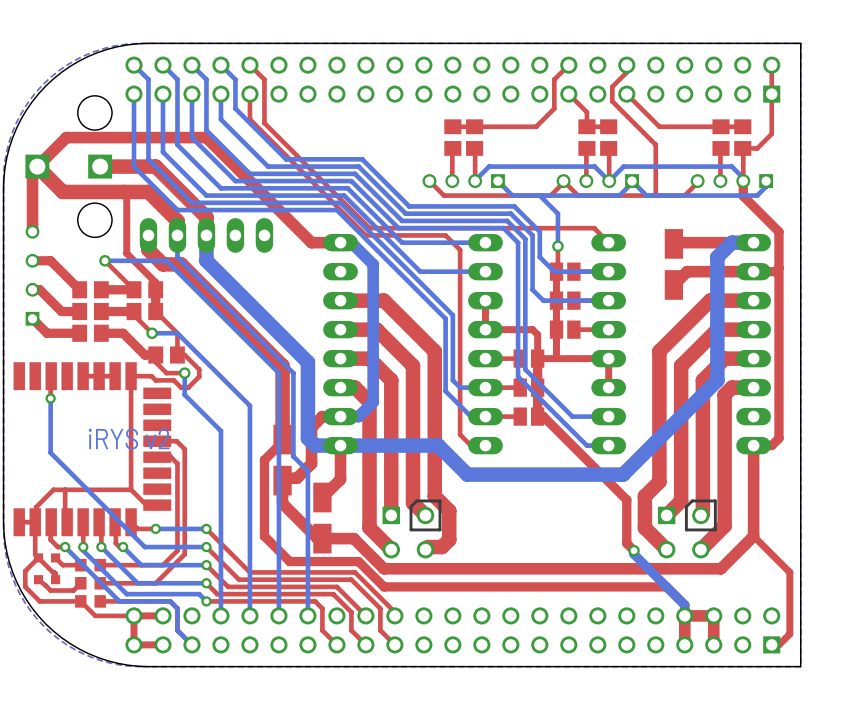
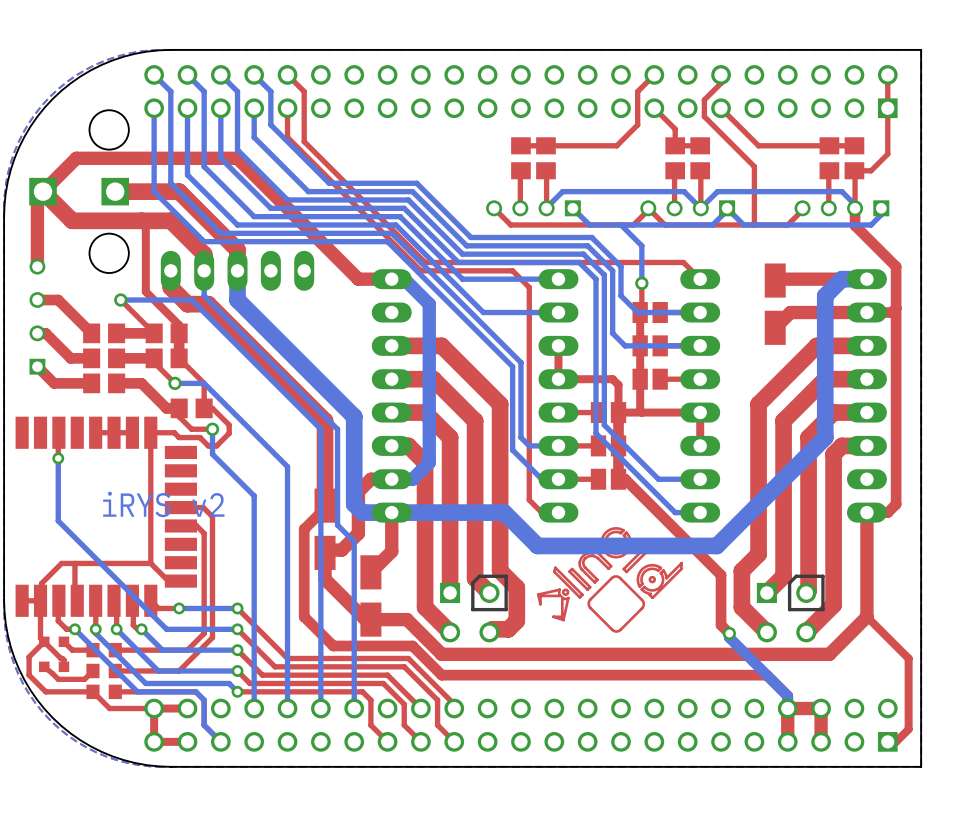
top track: none -> (623, 530) (621, 533) (613, 532) (607, 535) (605, 542) (607, 548) (604, 551) (601, 543) (605, 533) (614, 528) (620, 528) (621, 529) (623, 530)
top track: none -> (626, 532) (623, 535) (626, 542) (624, 549) (617, 553) (609, 551) (607, 554) (617, 557) (626, 552) (630, 542) (626, 532)
top track: none -> (592, 547) (611, 566) (608, 568) (594, 556) (585, 558) (583, 565) (597, 579) (594, 582) (581, 568) (579, 563) (583, 555) (593, 553) (589, 549) (592, 547)
top track: none -> (642, 550) (623, 569) (626, 571) (645, 553) (642, 550)
top track: none -> (681, 563) (666, 578) (663, 570) (660, 573) (663, 580) (658, 588) (650, 590) (644, 586) (641, 589) (650, 593) (652, 597) (681, 569) (681, 563)
top track: none -> (555, 567) (582, 594) (579, 597) (554, 571) (555, 567)
top track: none -> (660, 568) (658, 570) (651, 568) (645, 571) (641, 577) (642, 583) (639, 586) (638, 576) (642, 568) (652, 565) (660, 568)
top track: none -> (572, 569) (590, 587) (587, 589) (569, 571) (572, 569)
drawing: none -> [648, 575, 657, 584]
top track: none -> (620, 578) (642, 600) (643, 604) (620, 629) (615, 631) (590, 607) (588, 602) (612, 577) (616, 576) (620, 578)
drawing: none -> [561, 588, 570, 596]
top track: none -> (559, 589) (538, 594) (540, 604) (540, 595) (560, 595) (559, 589)
top track: none -> (562, 597) (562, 616) (553, 616) (563, 620) (568, 598) (562, 597)

